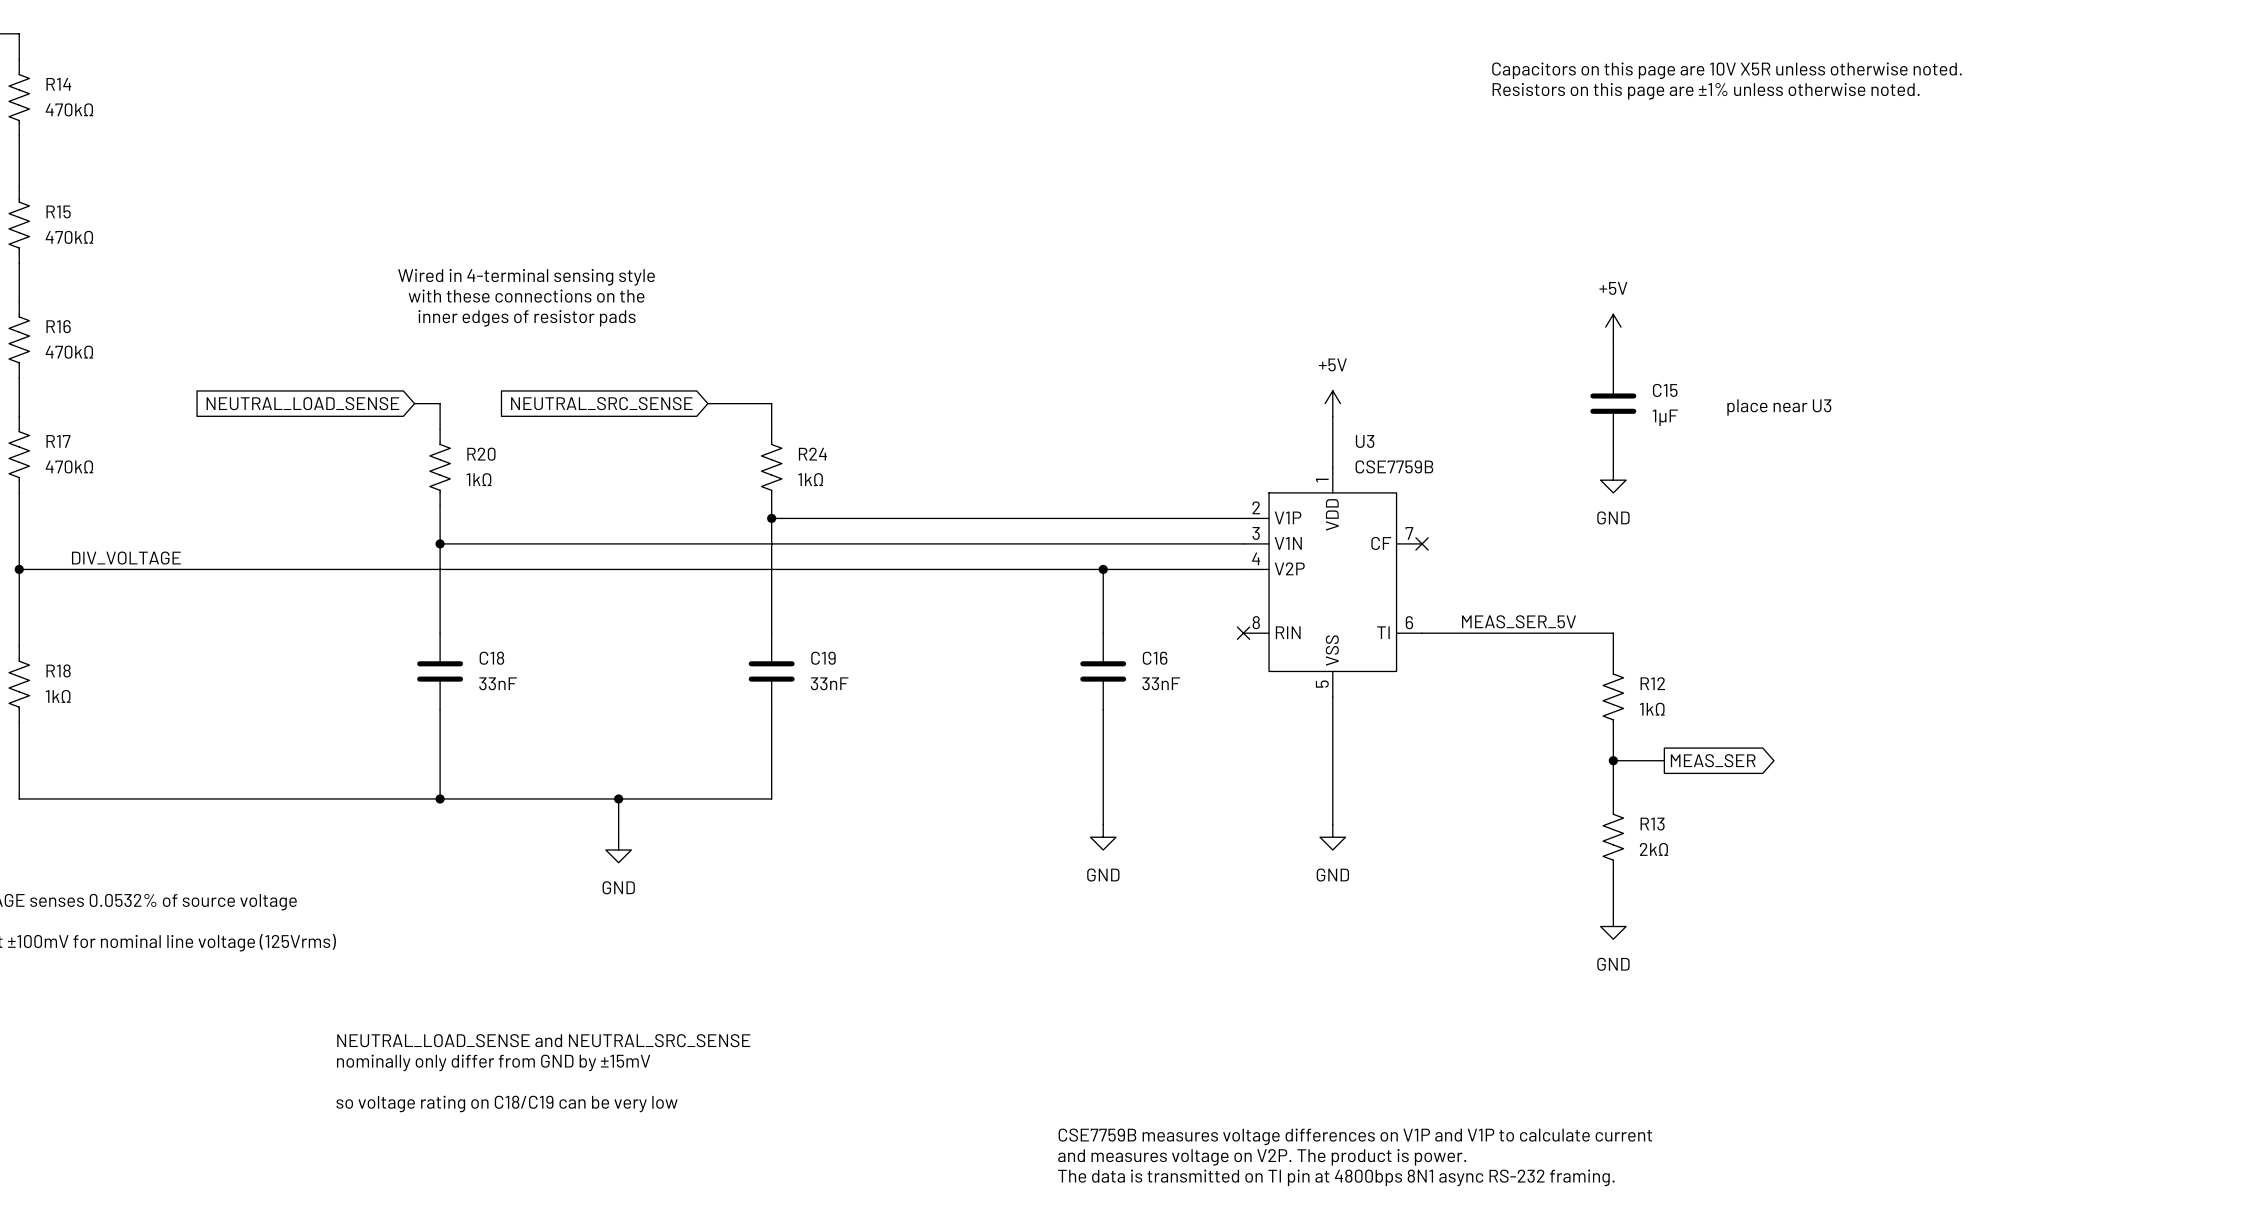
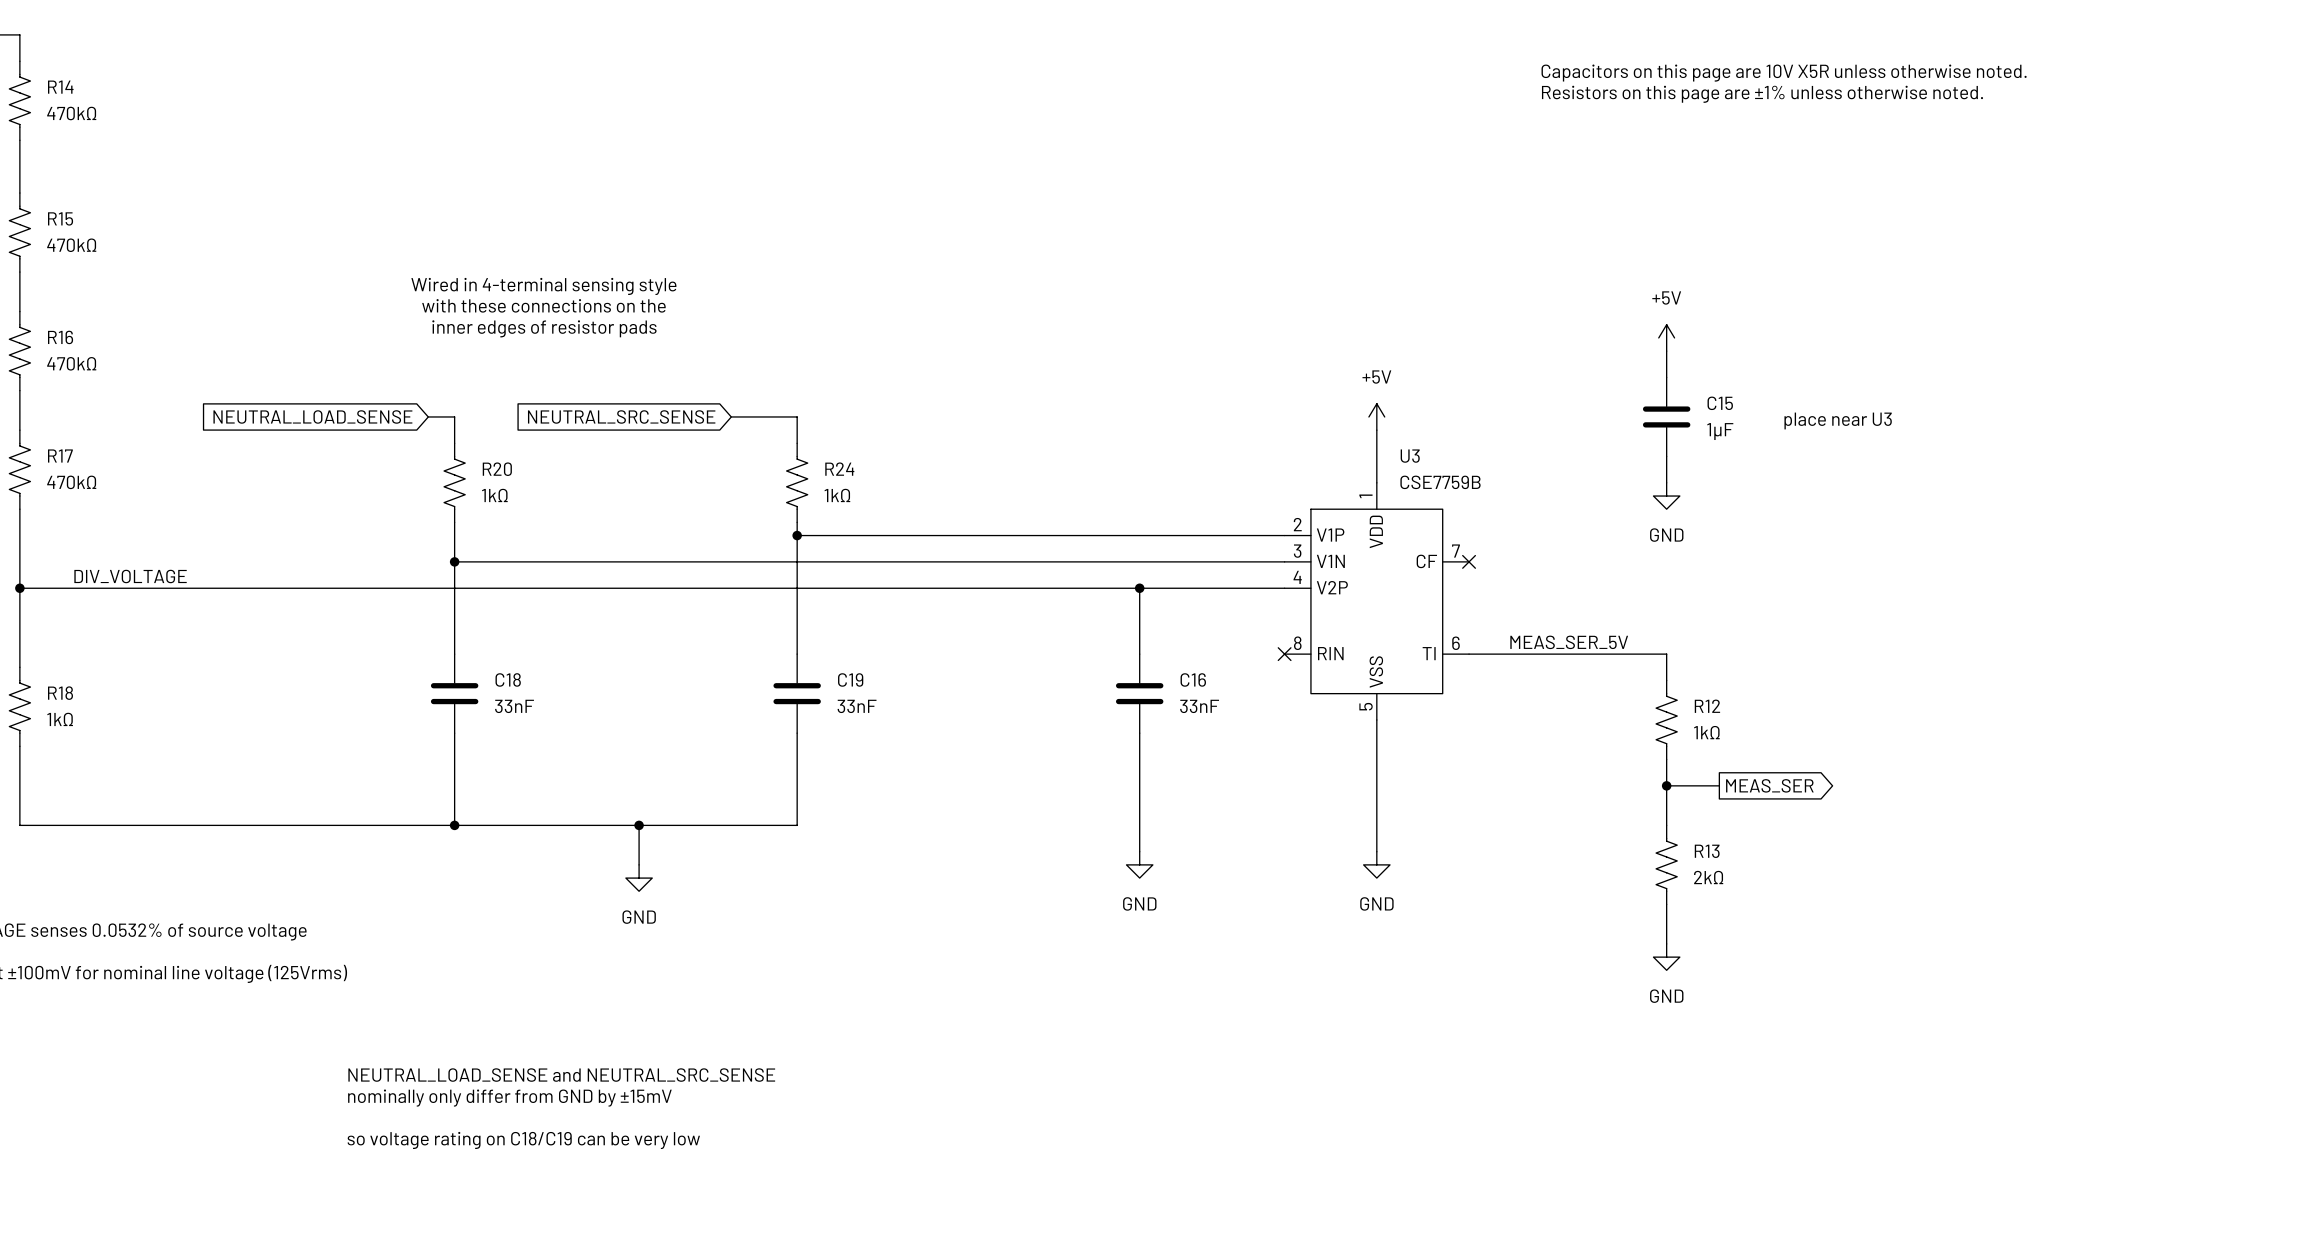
text: CSE7759B measures voltage differences on V1P and V1P to calculate current (1355, 1136) -> none
text: and measures voltage on V2P. The product is power. (1262, 1157) -> none
text: The data is transmitted on TI pin at 4800bps 8N1 async RS-232 framing. (1336, 1177) -> none

